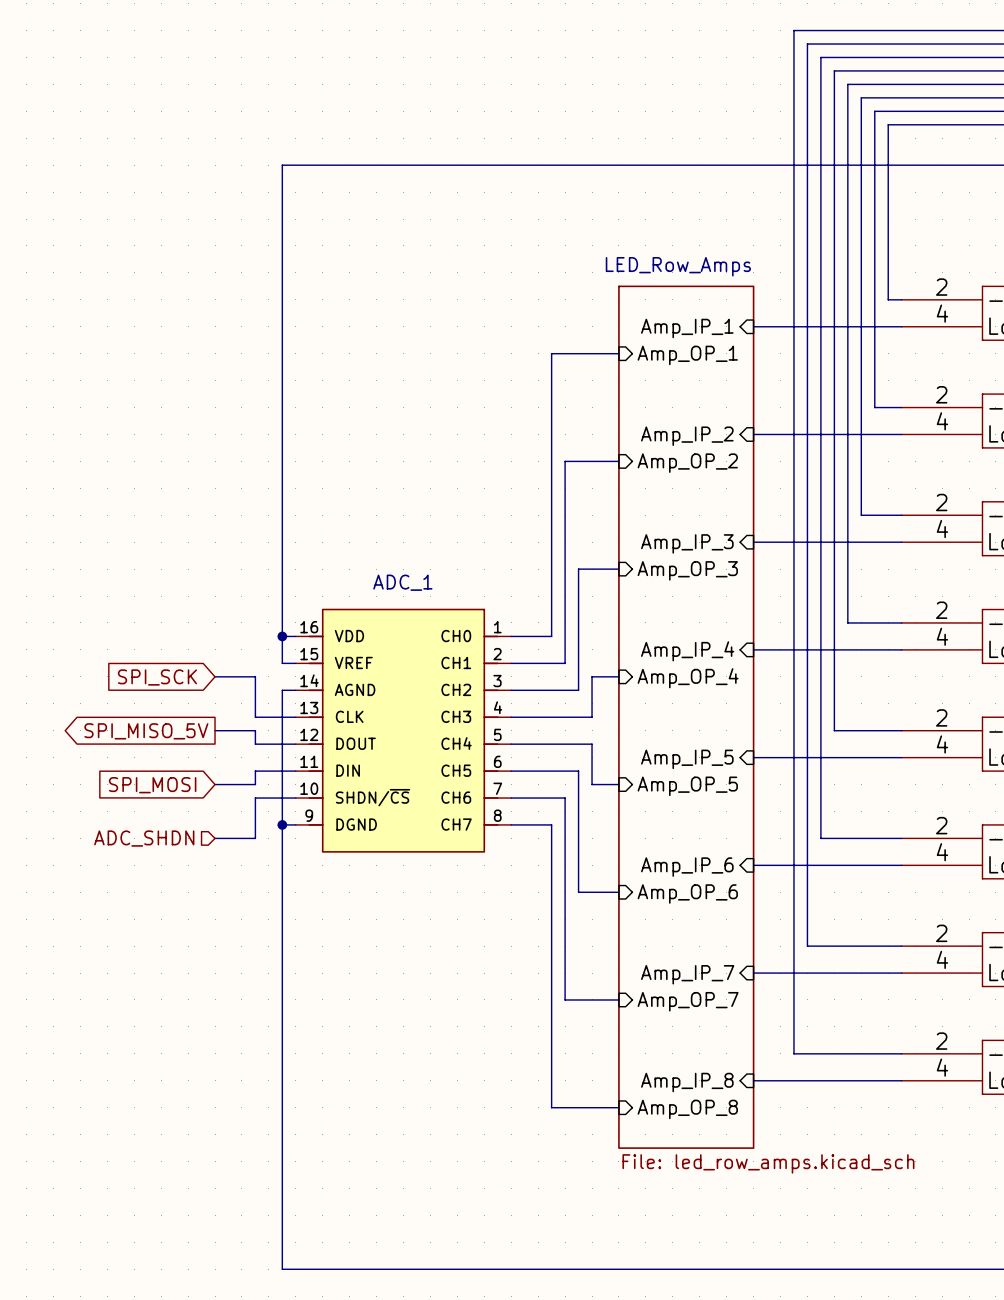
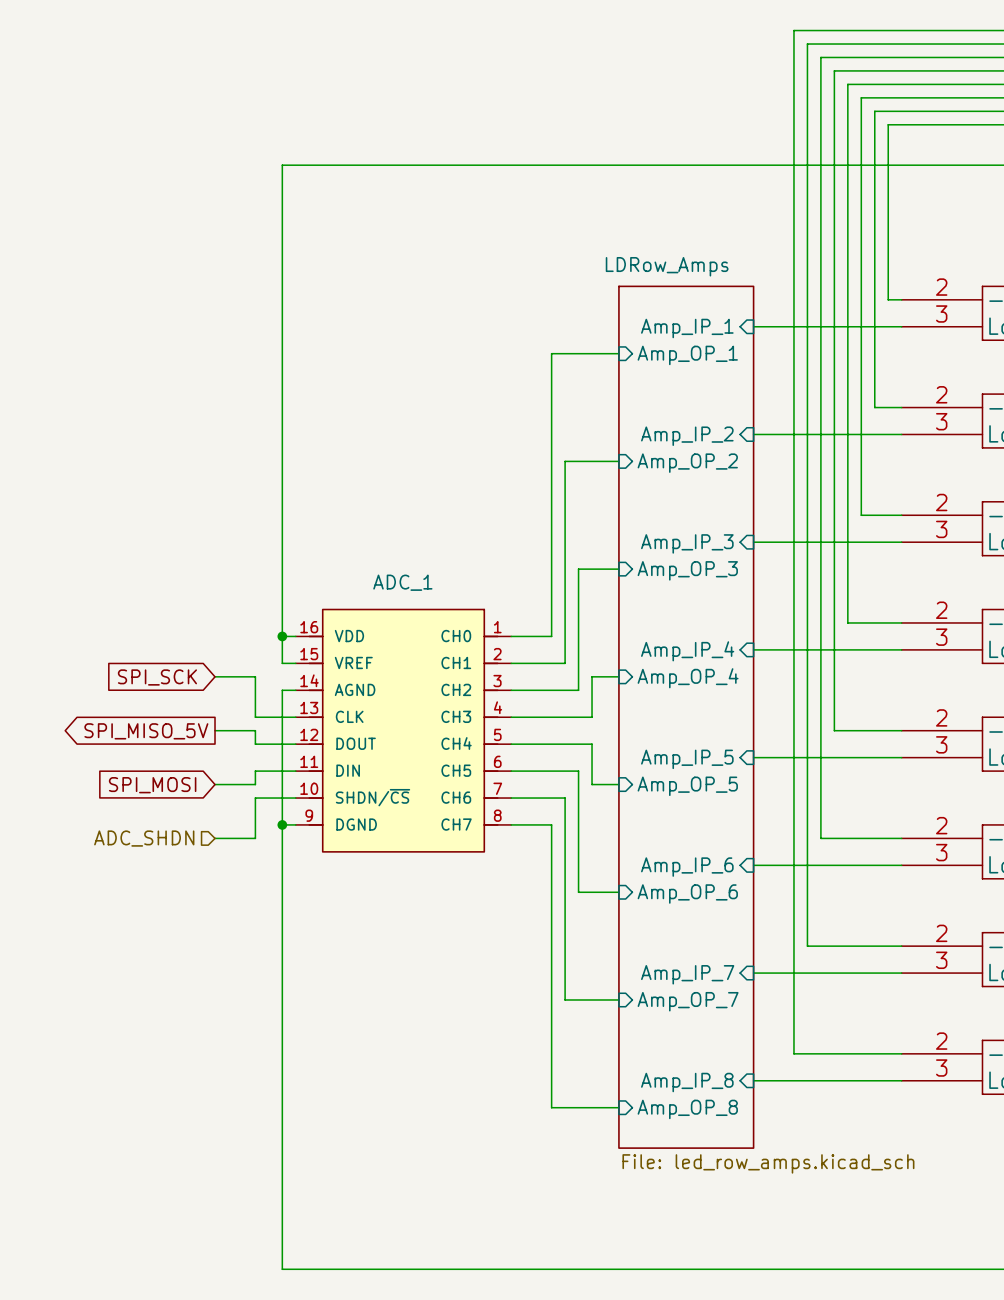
sheet LED_Row_Amps name: LED_Row_Amps (678, 266) -> LDRow_Amps (667, 266)
part pin number: 4 (942, 313) -> 3 (941, 313)
part pin number: 4 (942, 421) -> 3 (941, 421)
part pin number: 4 (942, 529) -> 3 (941, 529)
part pin number: 4 (942, 636) -> 3 (941, 637)
part pin number: 4 (942, 744) -> 3 (941, 744)
part pin number: 4 (942, 852) -> 3 (941, 852)
part pin number: 4 (942, 959) -> 3 (941, 960)
part pin number: 4 (942, 1067) -> 3 (941, 1068)

